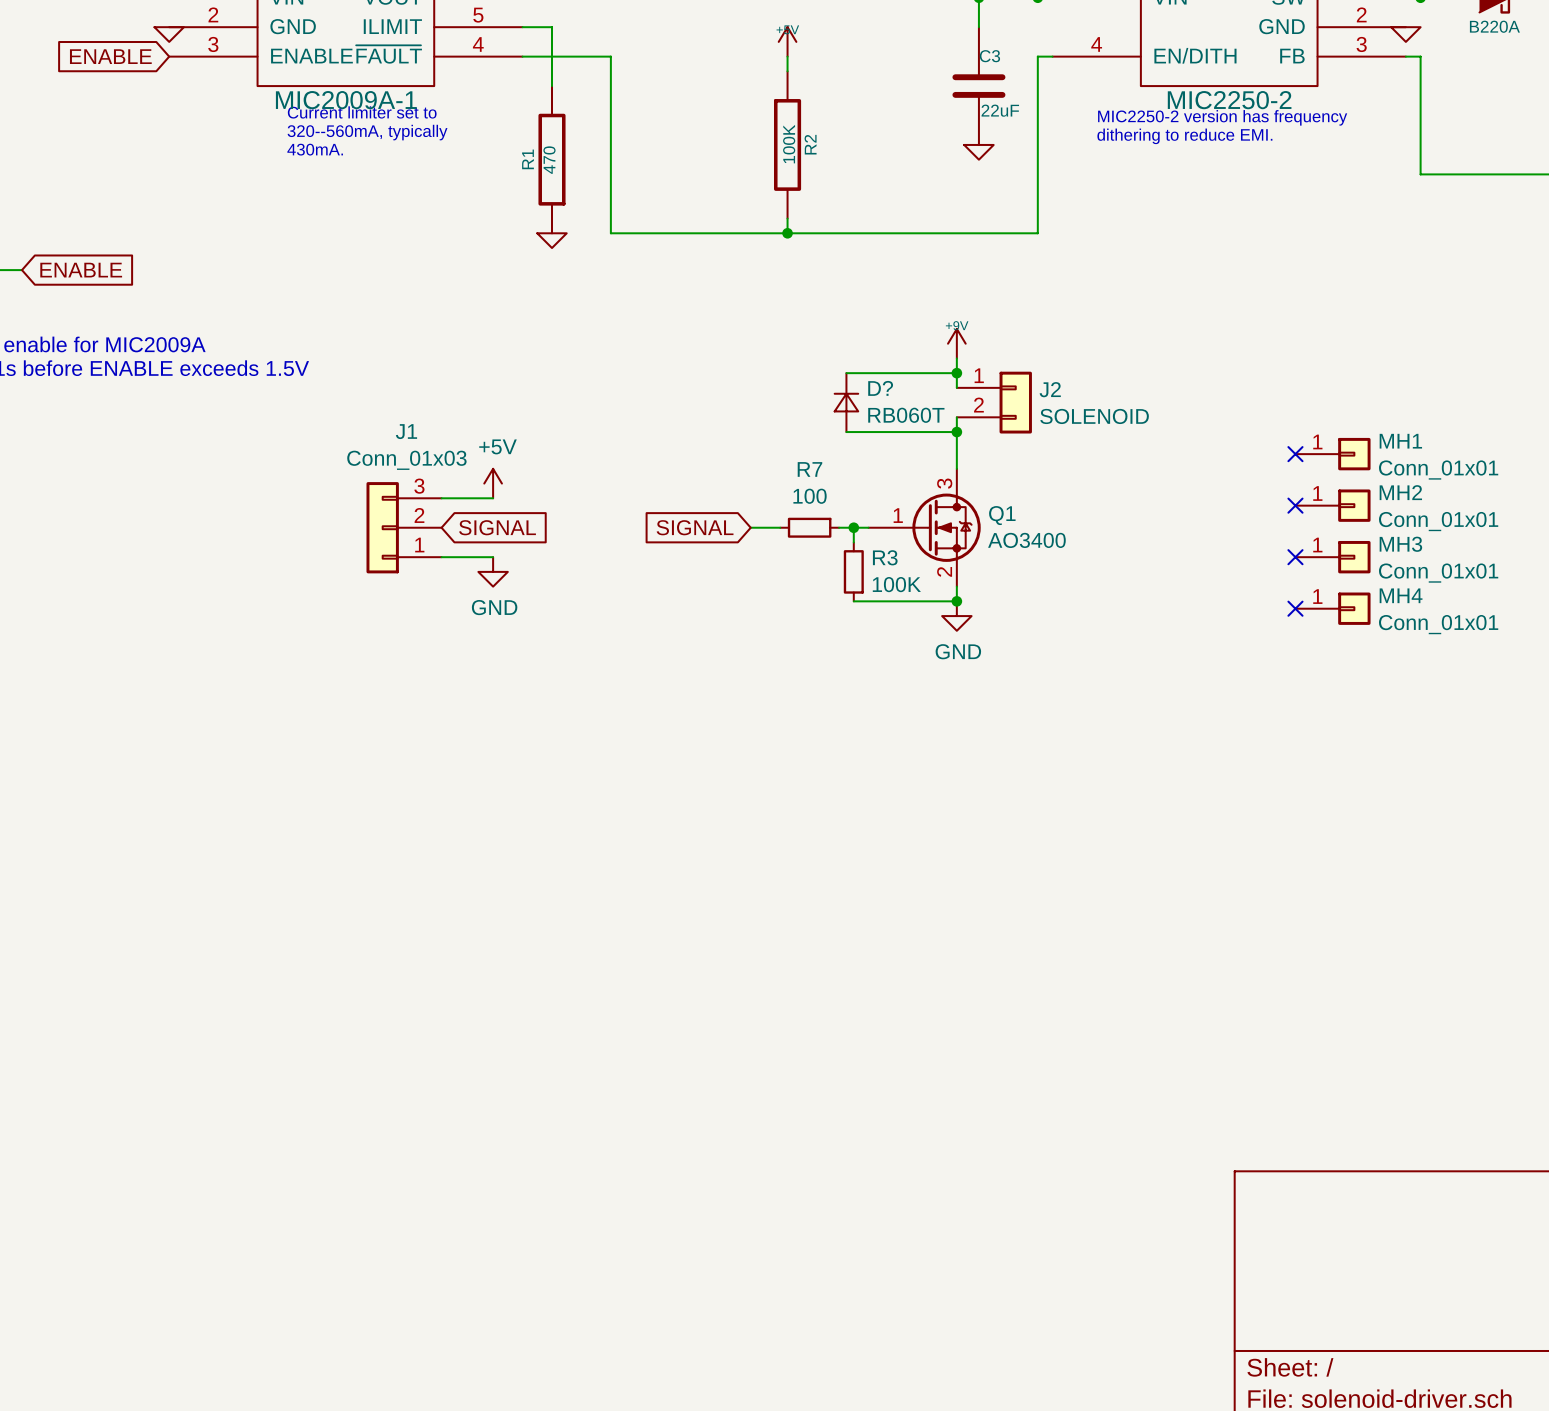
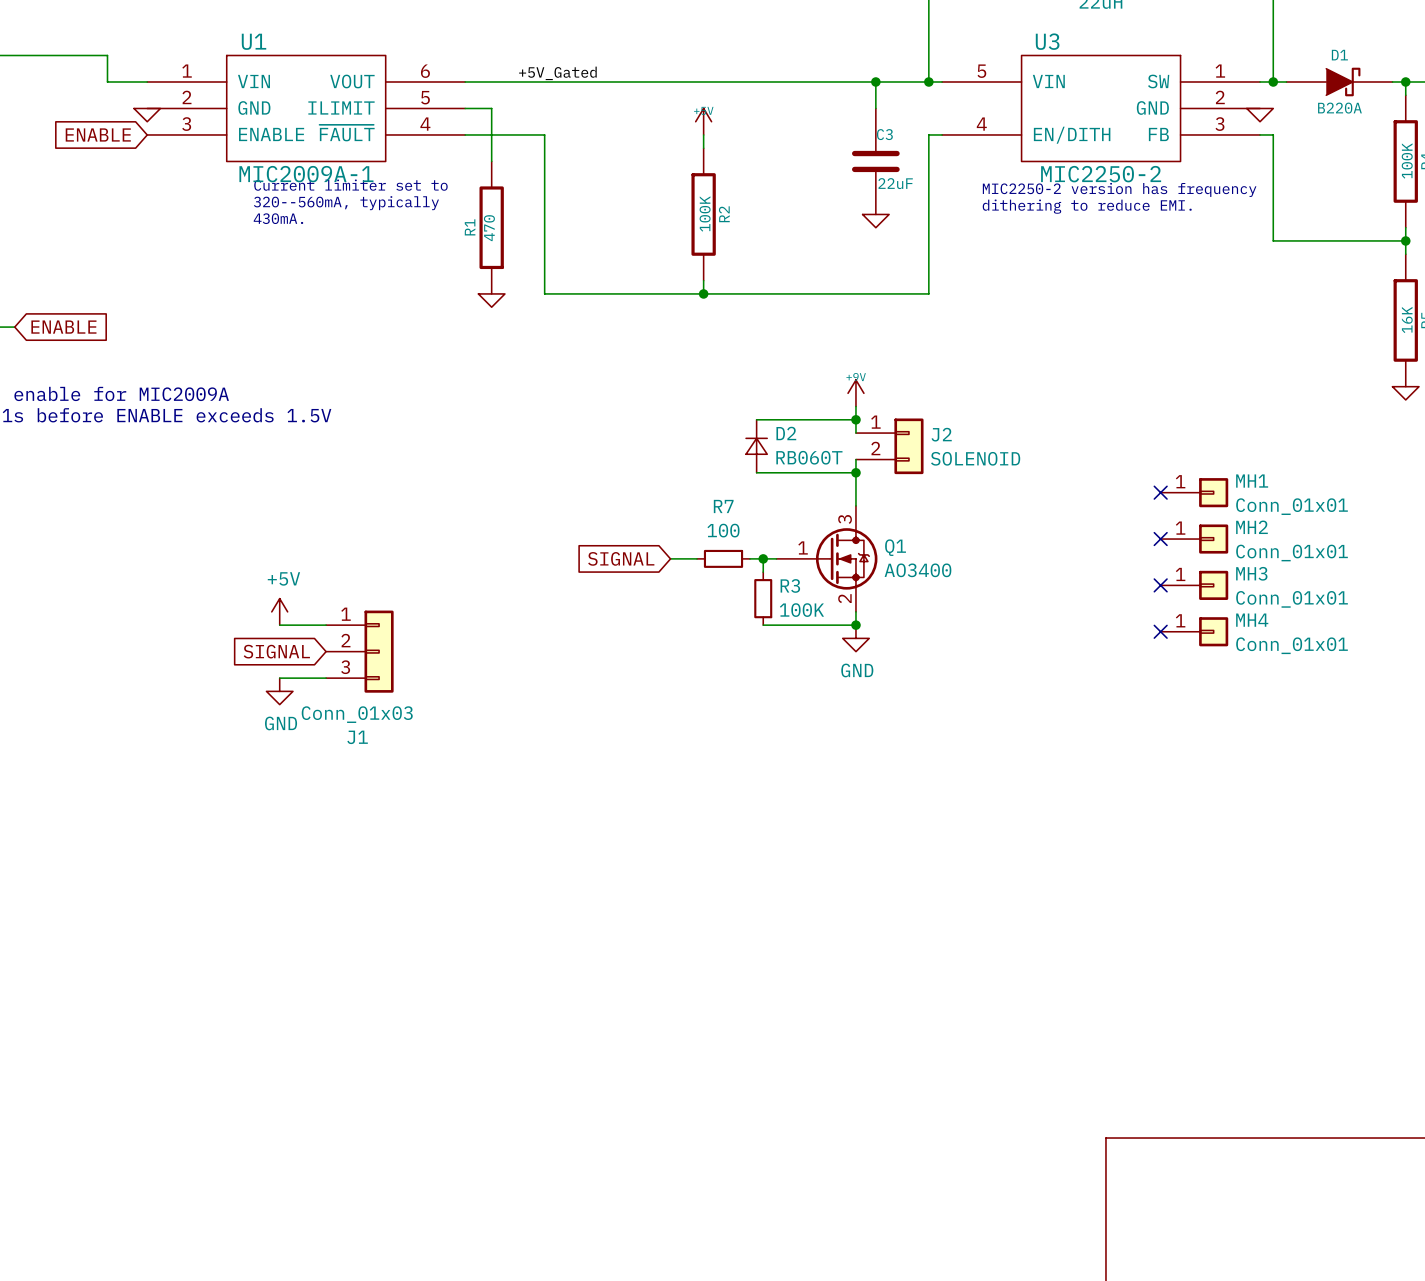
D? name: D? (880, 388) -> D2 (786, 433)
power symbol position: +5V (493, 483) -> +5V (279, 611)
wire: (441, 498) (493, 498) -> (279, 678) (326, 678)
J1 rotation: 0° (382, 527) -> 180° (379, 651)
J1 position: (404, 527) -> (359, 651)
global label rotation: 0° (497, 527) -> 180° (276, 651)
global label position: SIGNAL (497, 527) -> SIGNAL (276, 651)
wire: (441, 557) (493, 557) -> (279, 625) (326, 625)
power symbol position: GND (493, 571) -> GND (279, 691)

